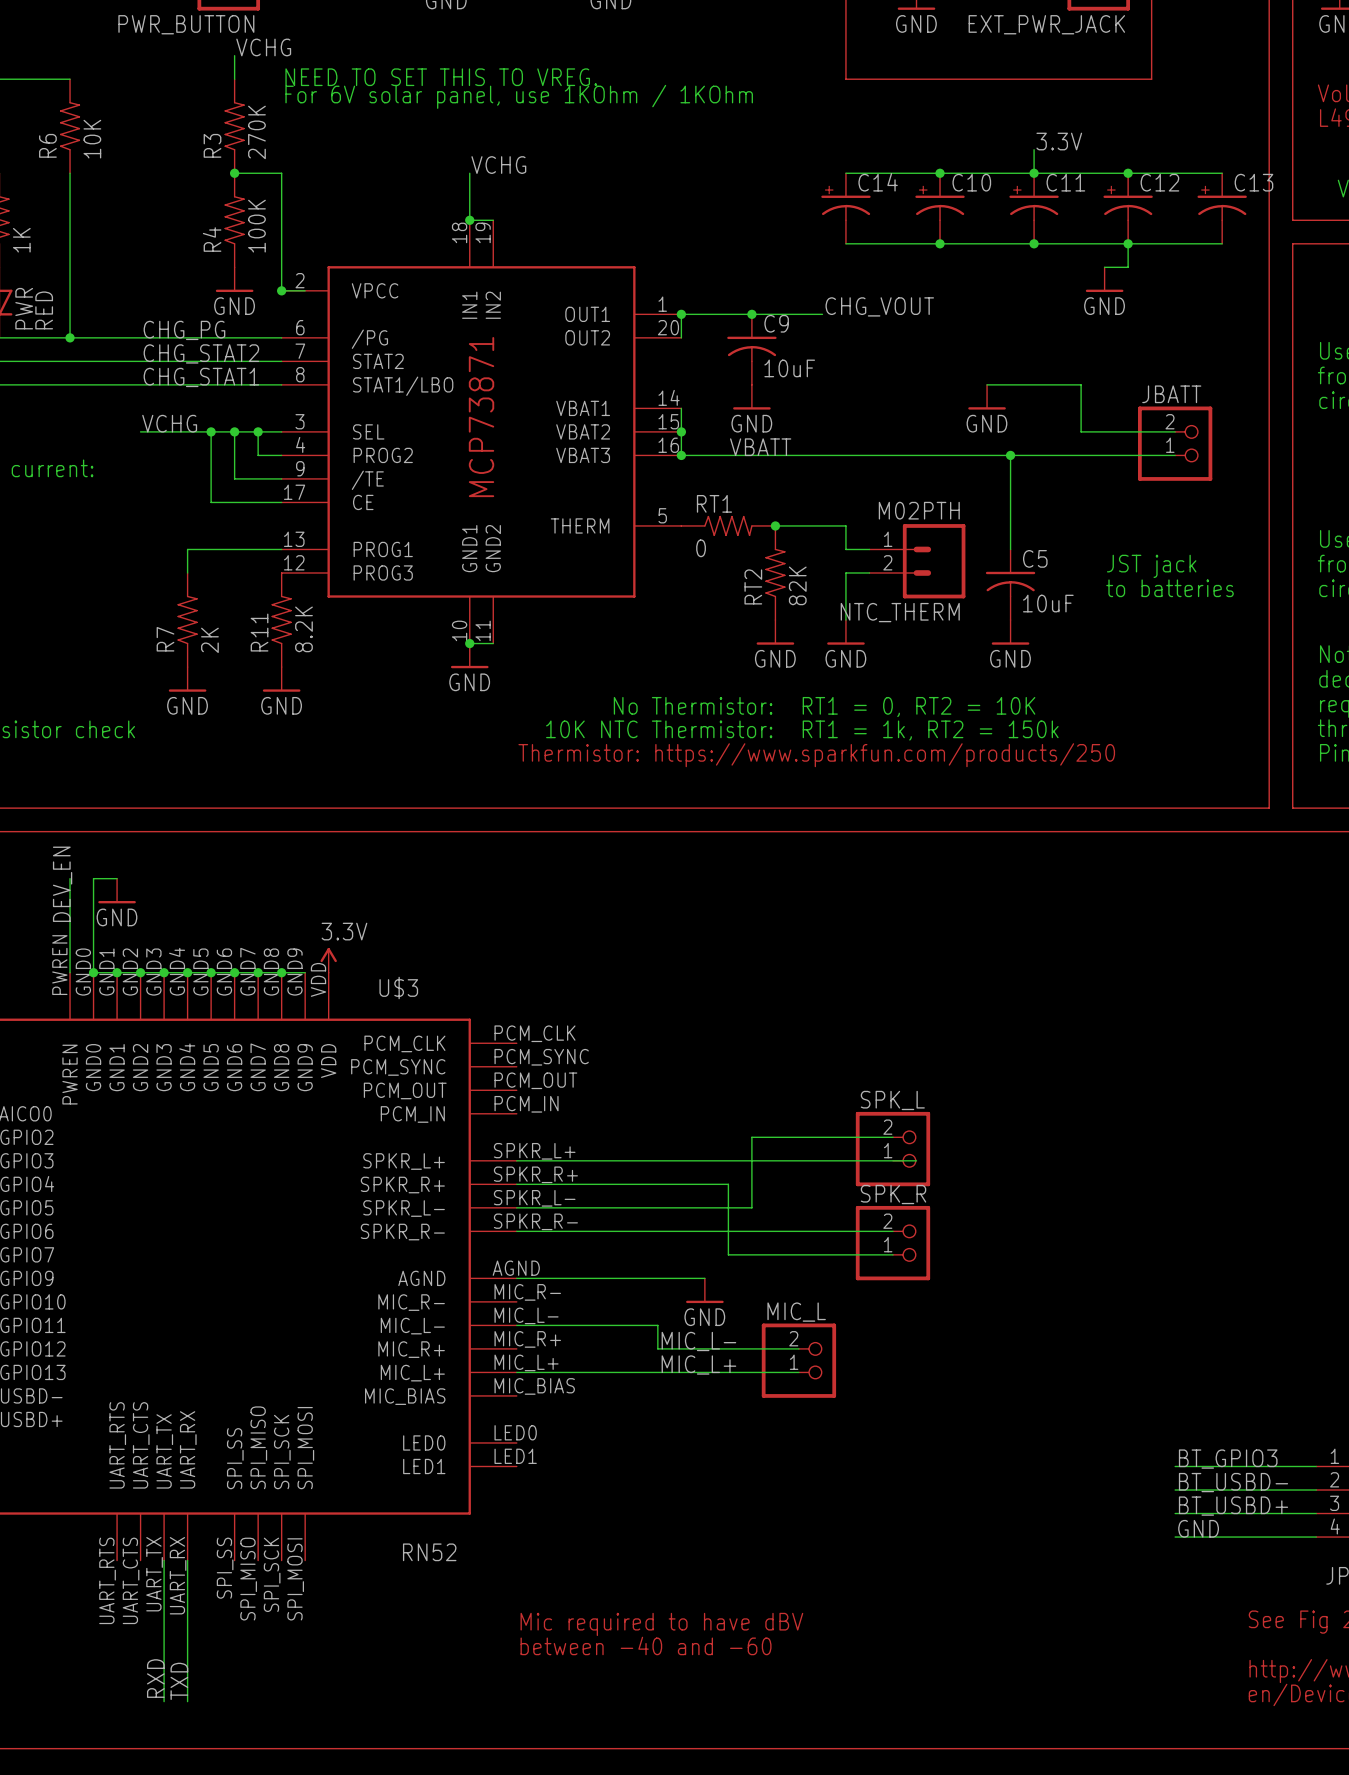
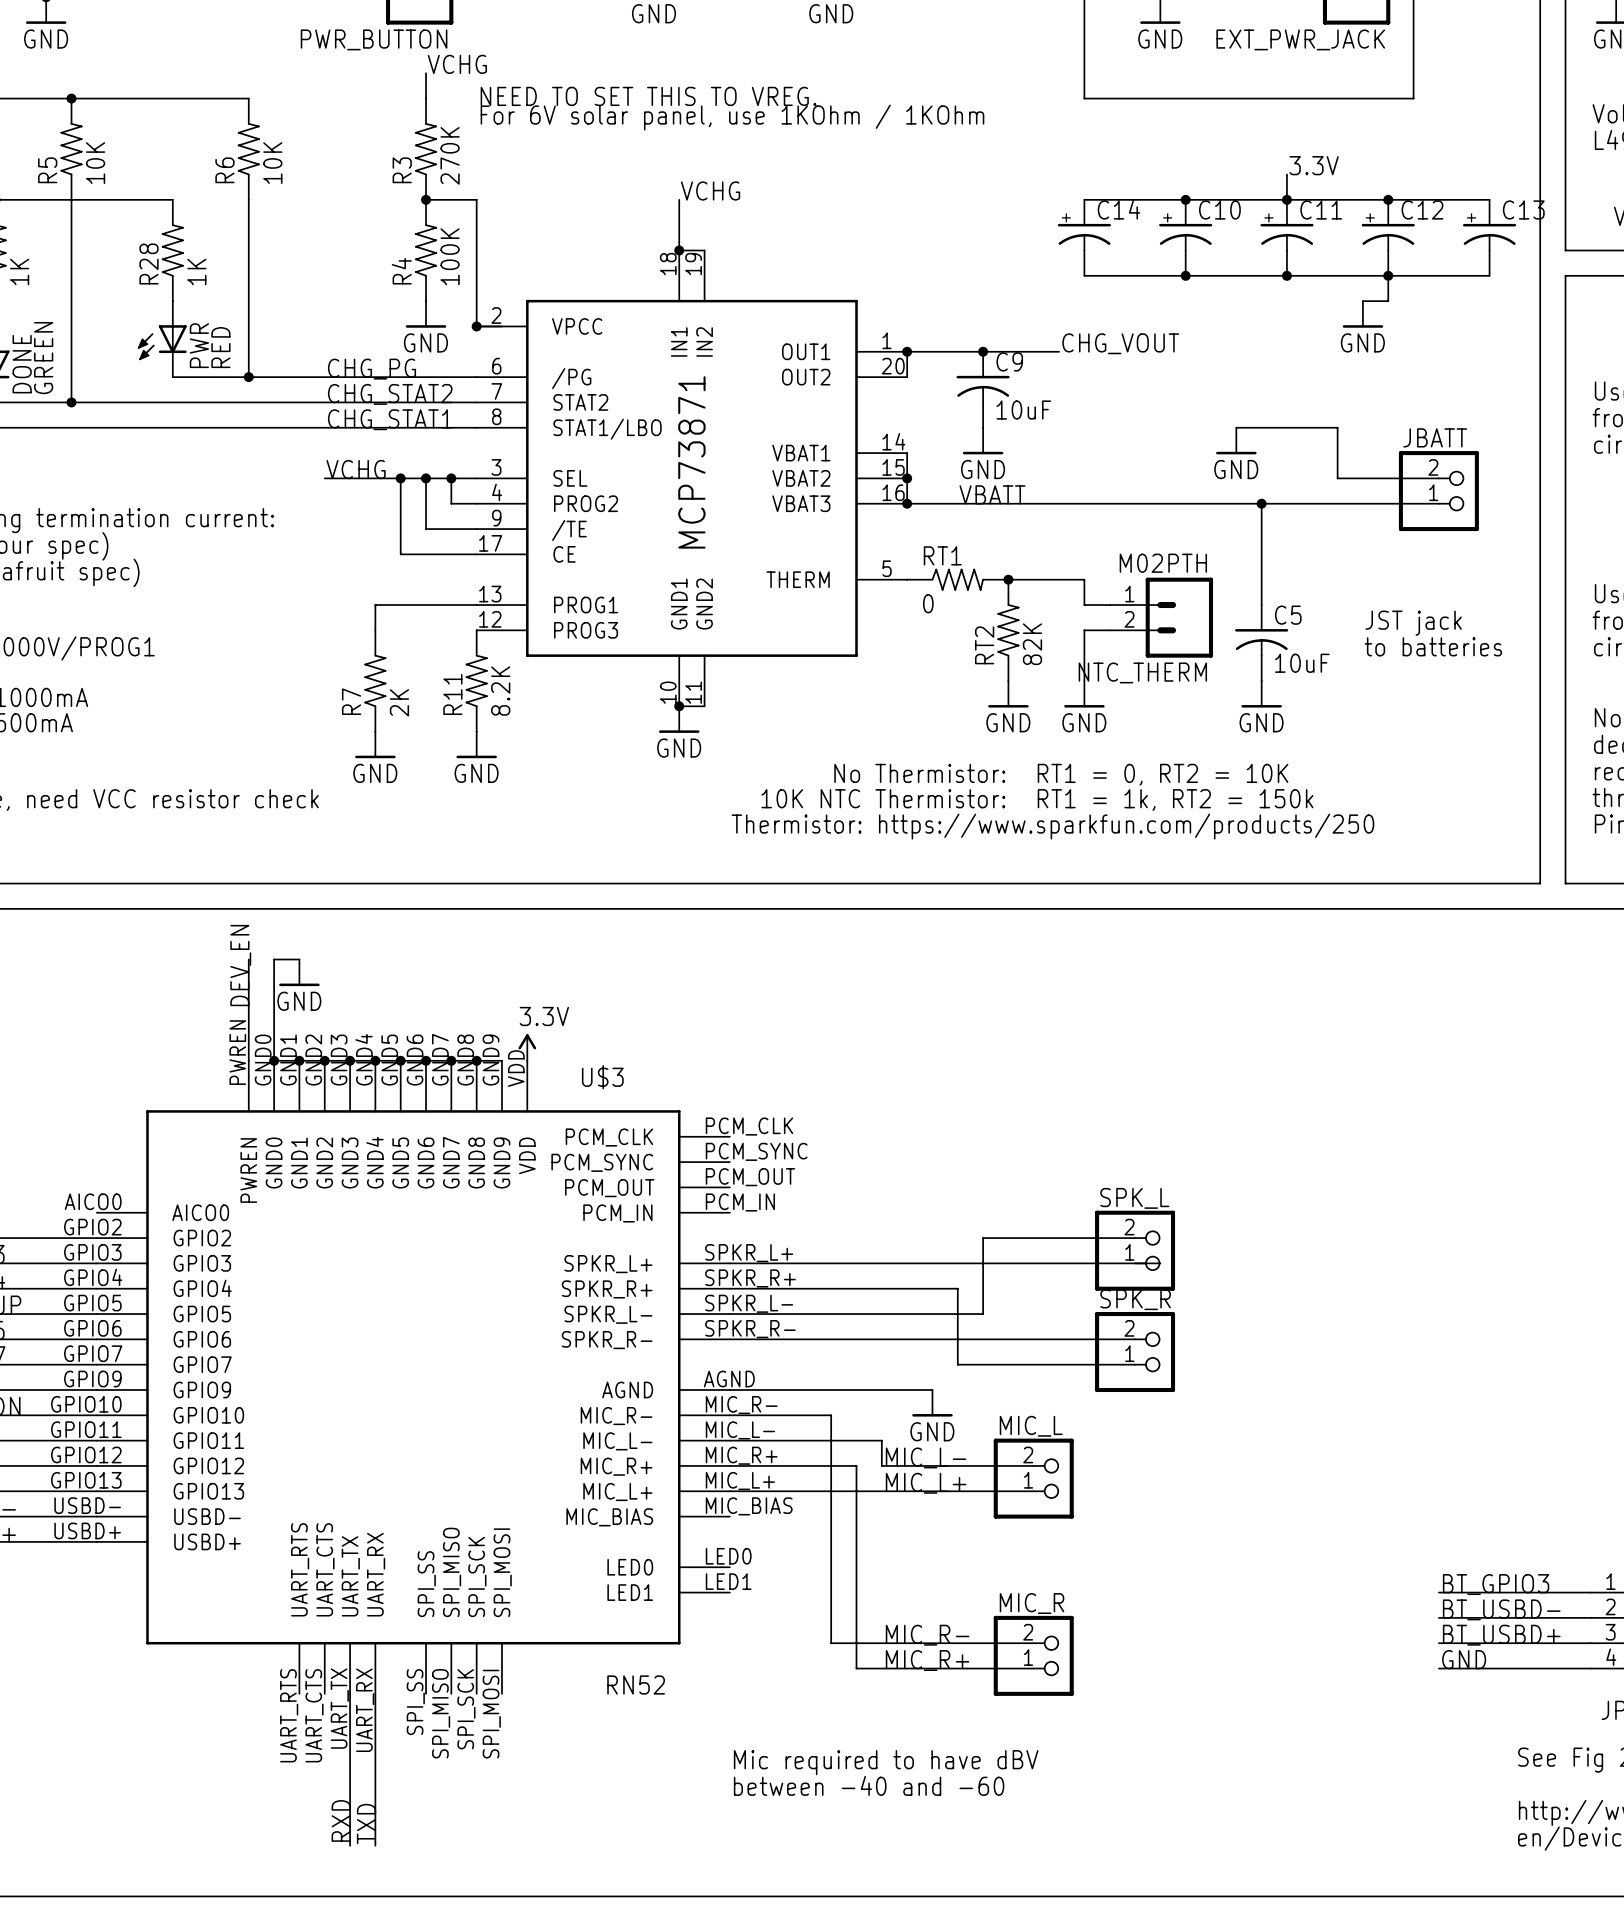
wire: none -> (729, 1415) (831, 1415) (831, 1643) (1033, 1643)
wire: none -> (729, 1465) (856, 1465) (856, 1668) (1033, 1668)
label: none -> MIC_R- (927, 1635)
MIC_R: none -> (1033, 1655)
label: none -> MIC_R+ (927, 1660)

